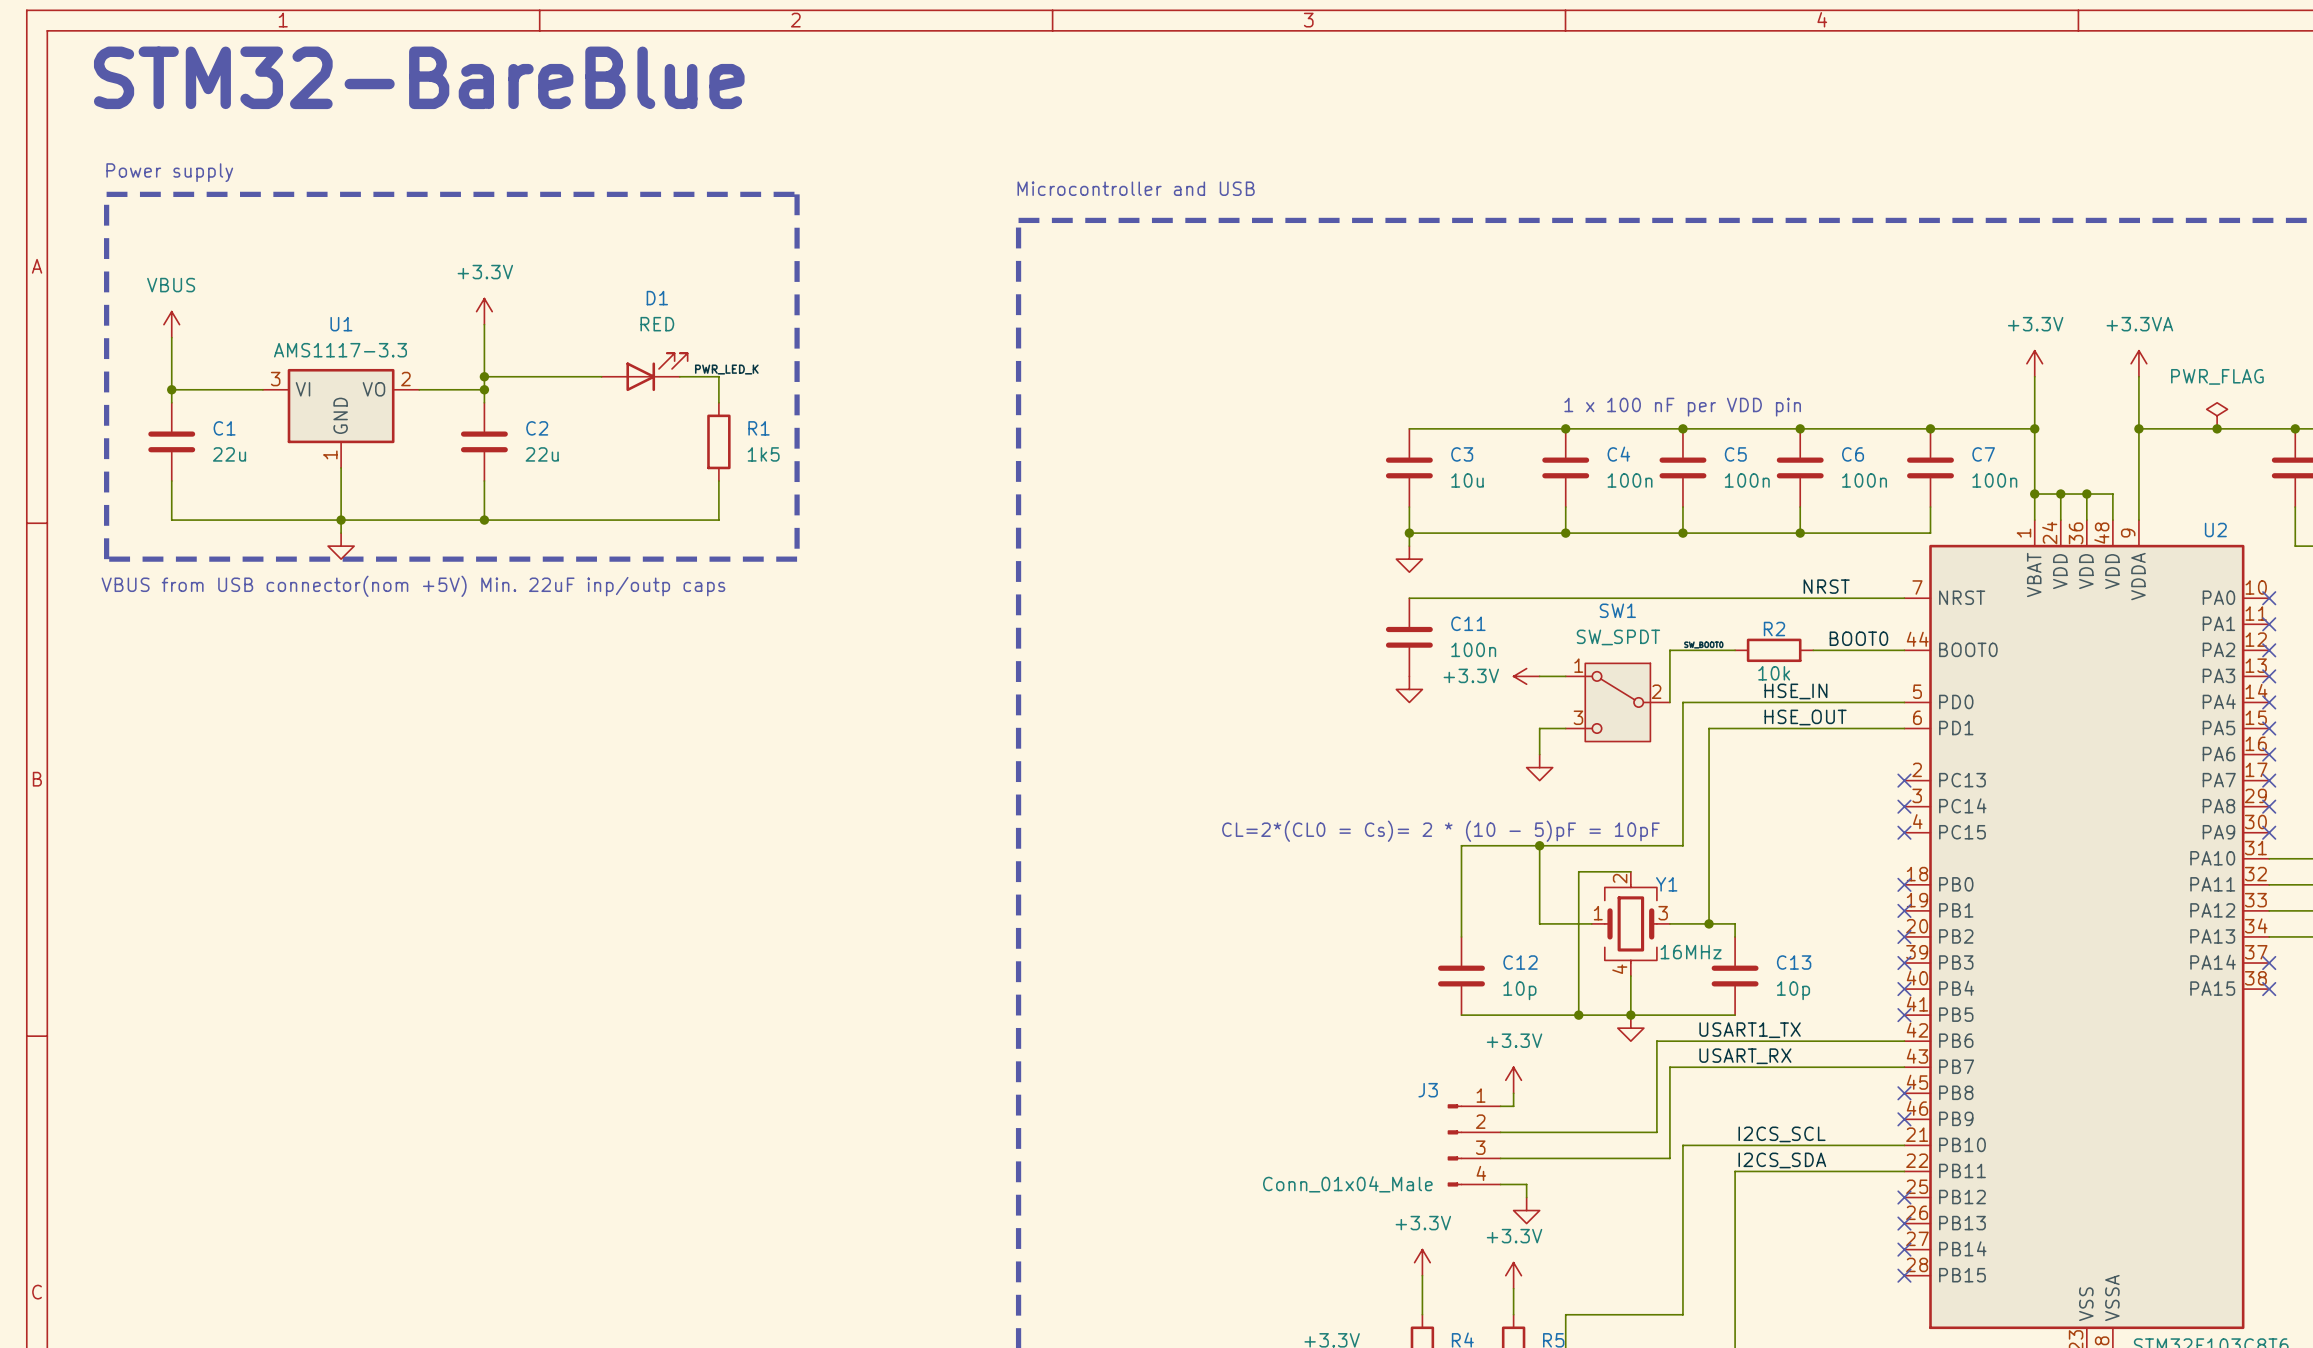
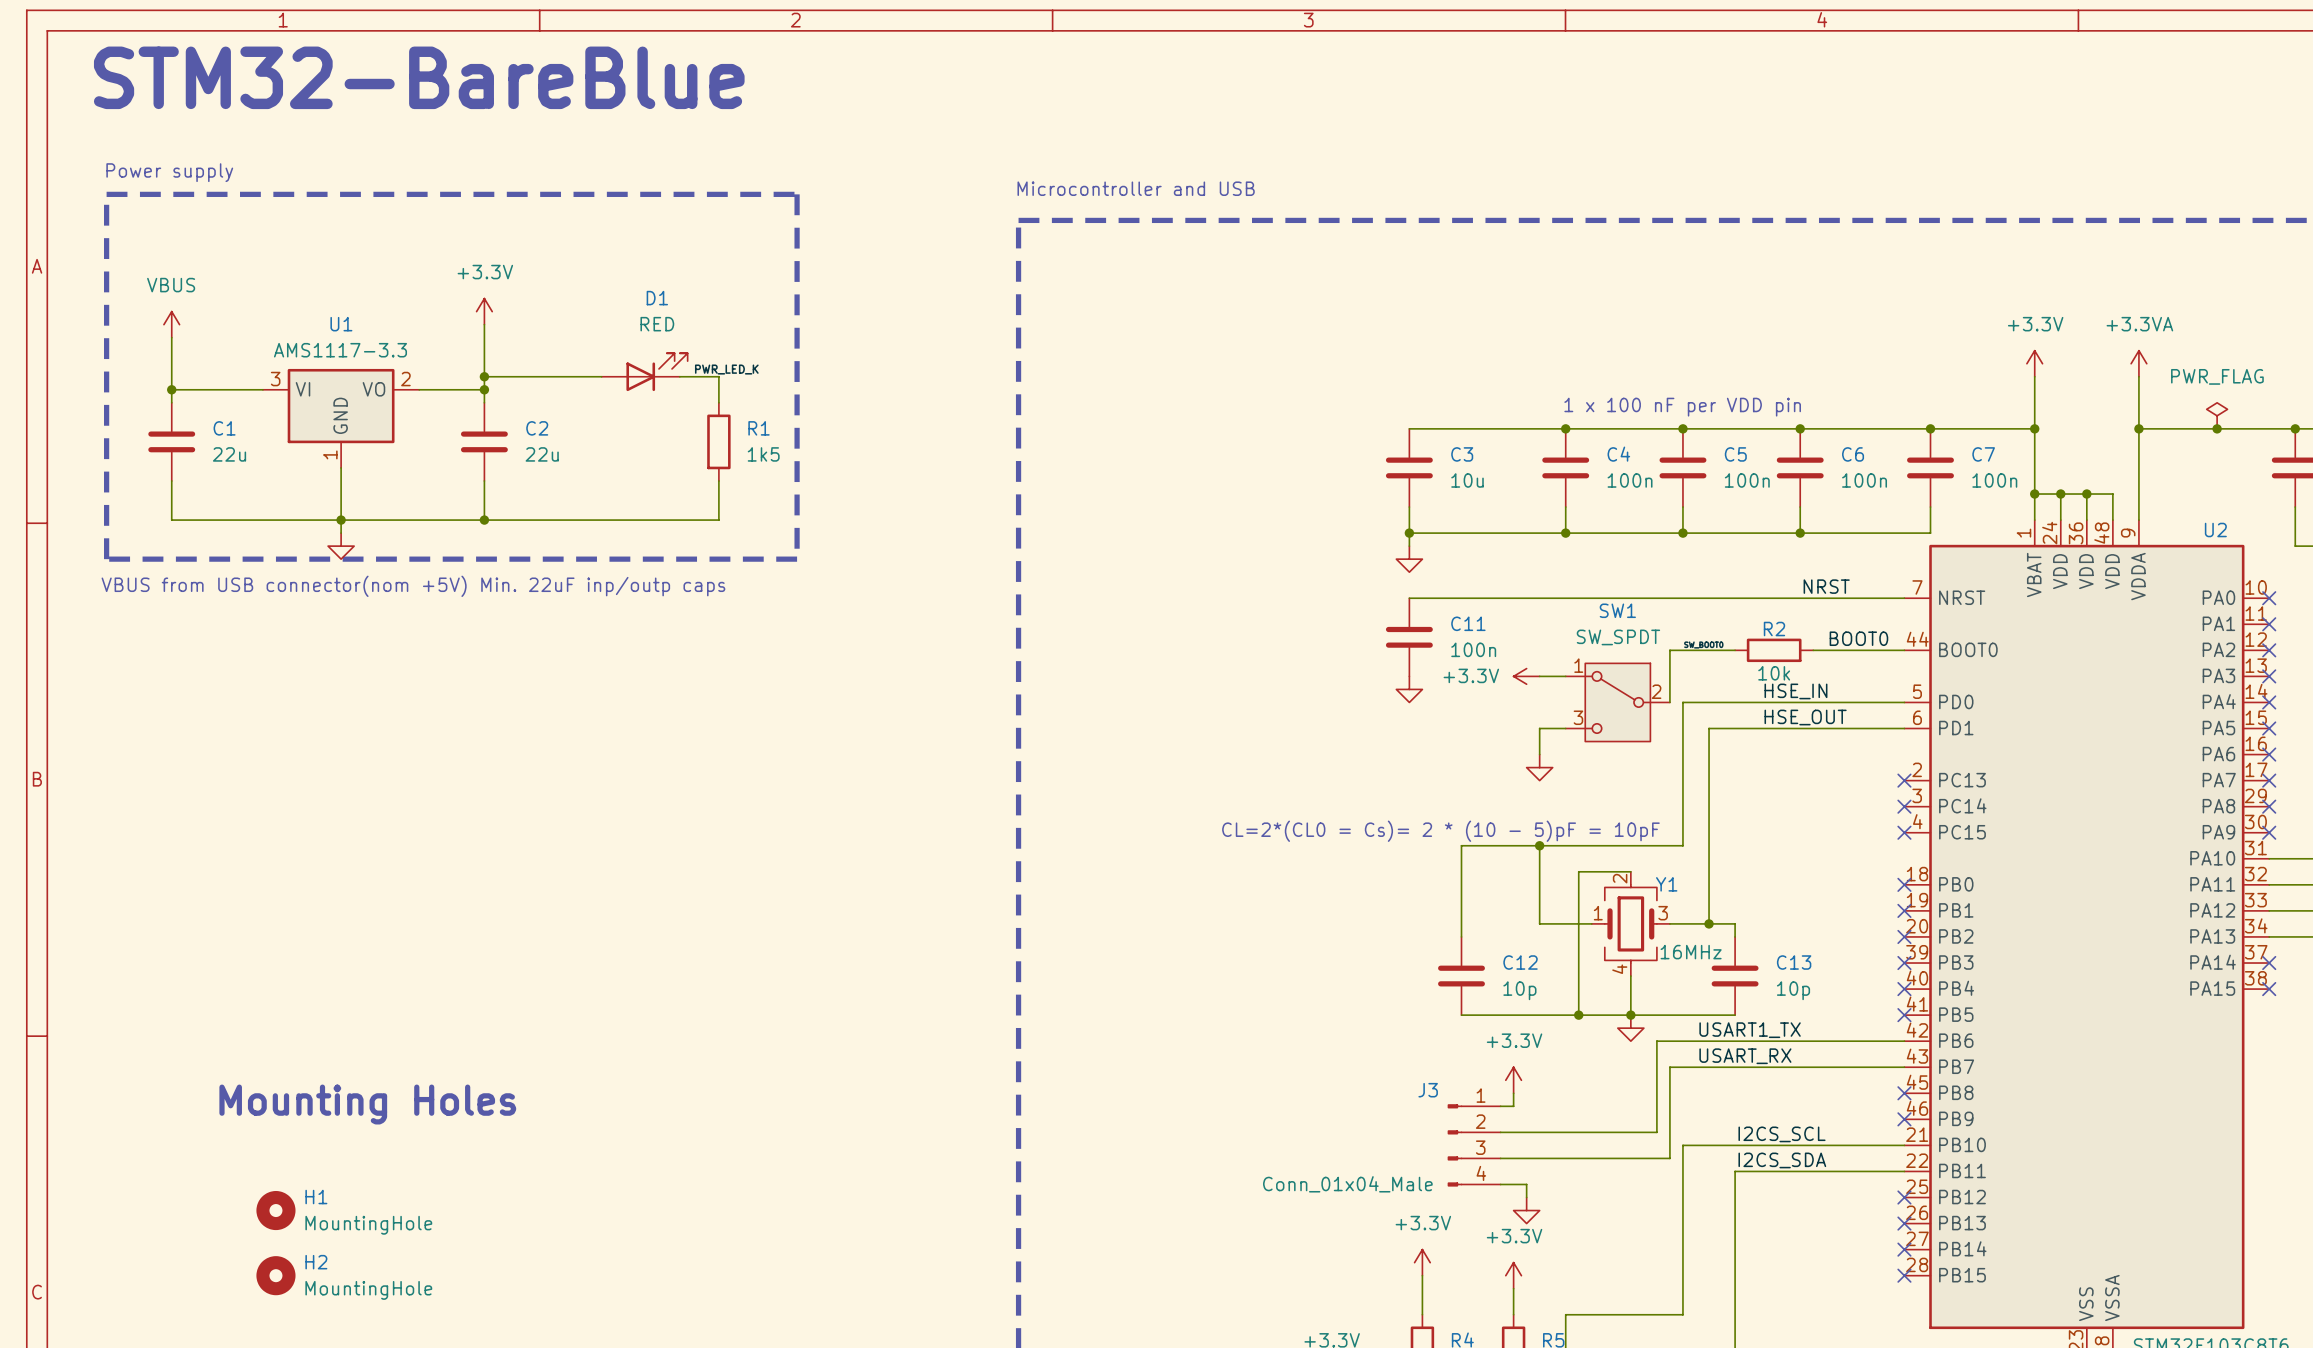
text: none -> Mounting Holes (367, 1104)
H1: none -> MountingHole (275, 1210)
H2: none -> MountingHole (275, 1275)

